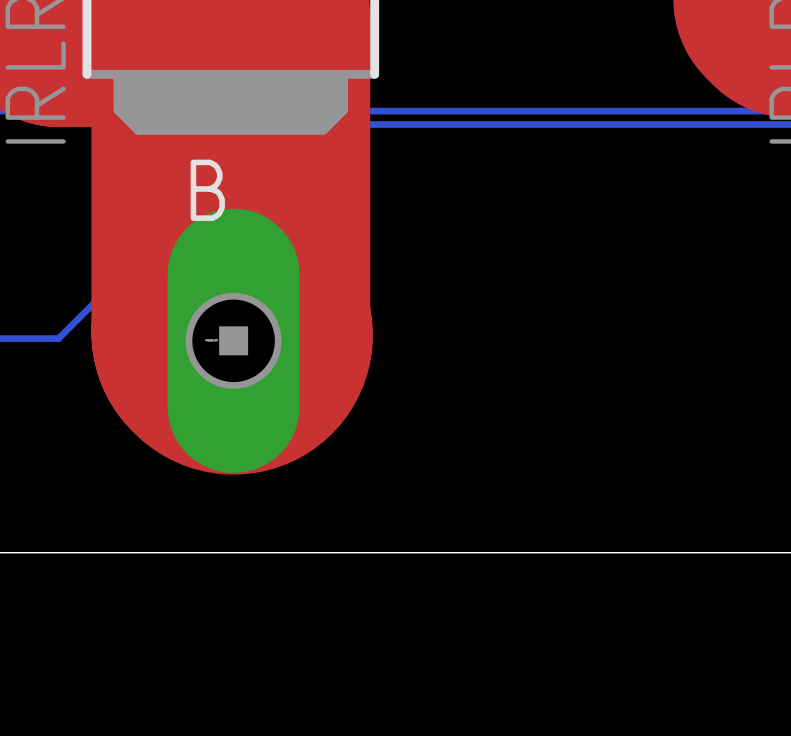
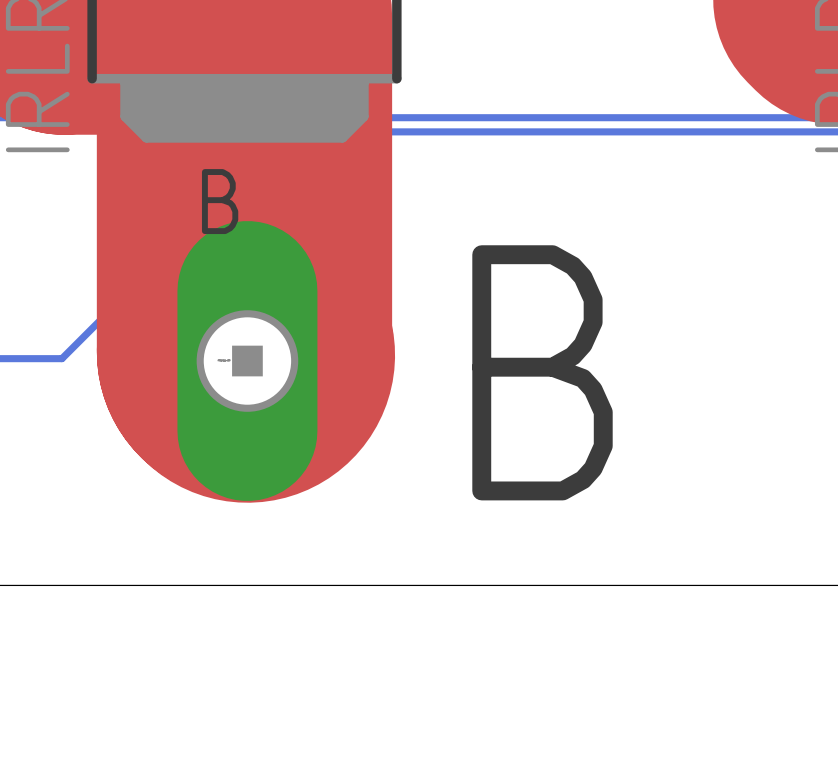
text: none -> B (542, 372)

